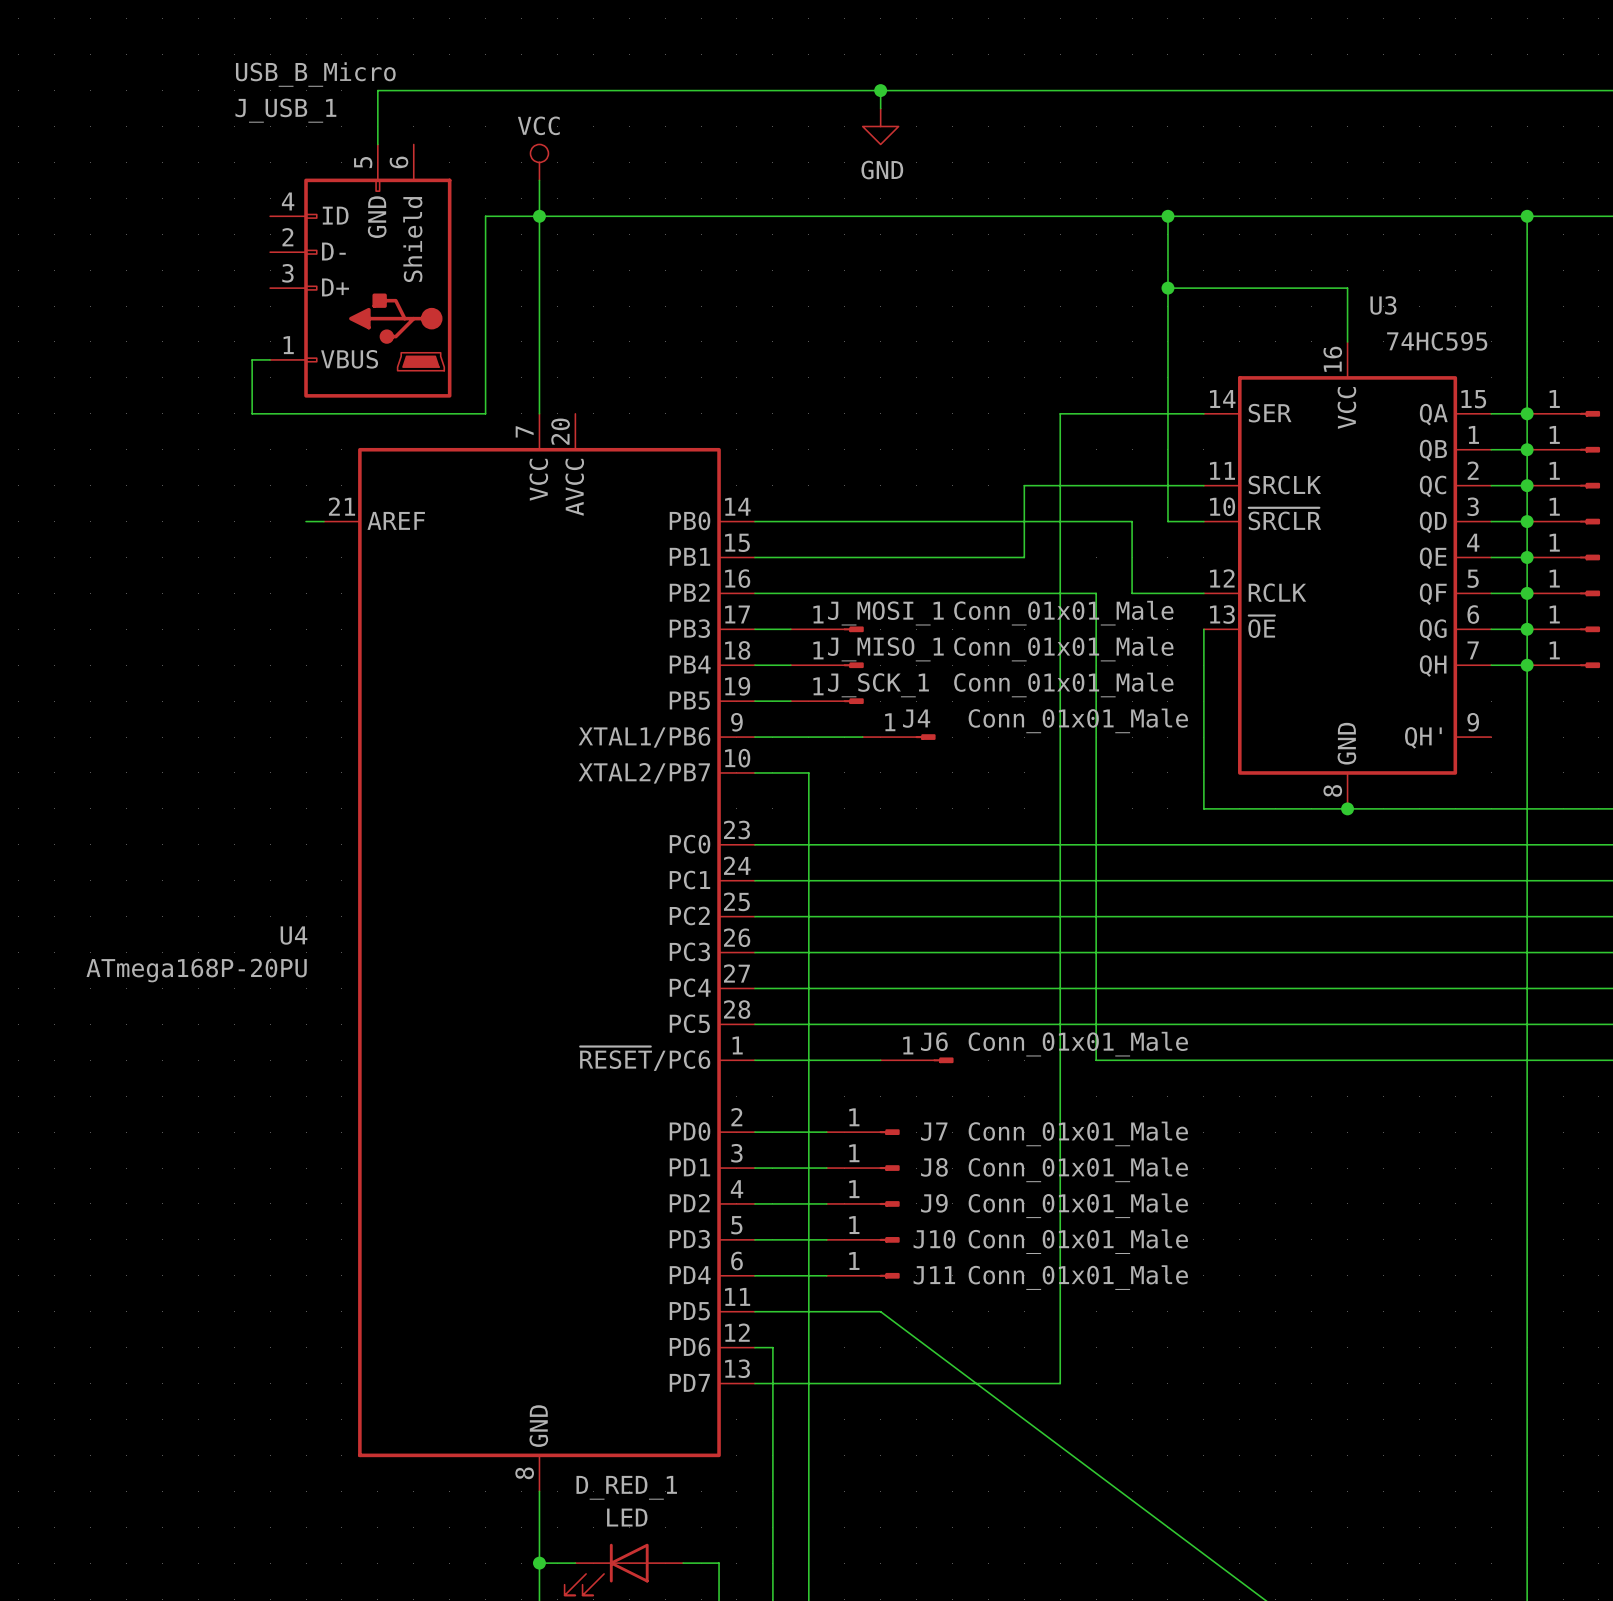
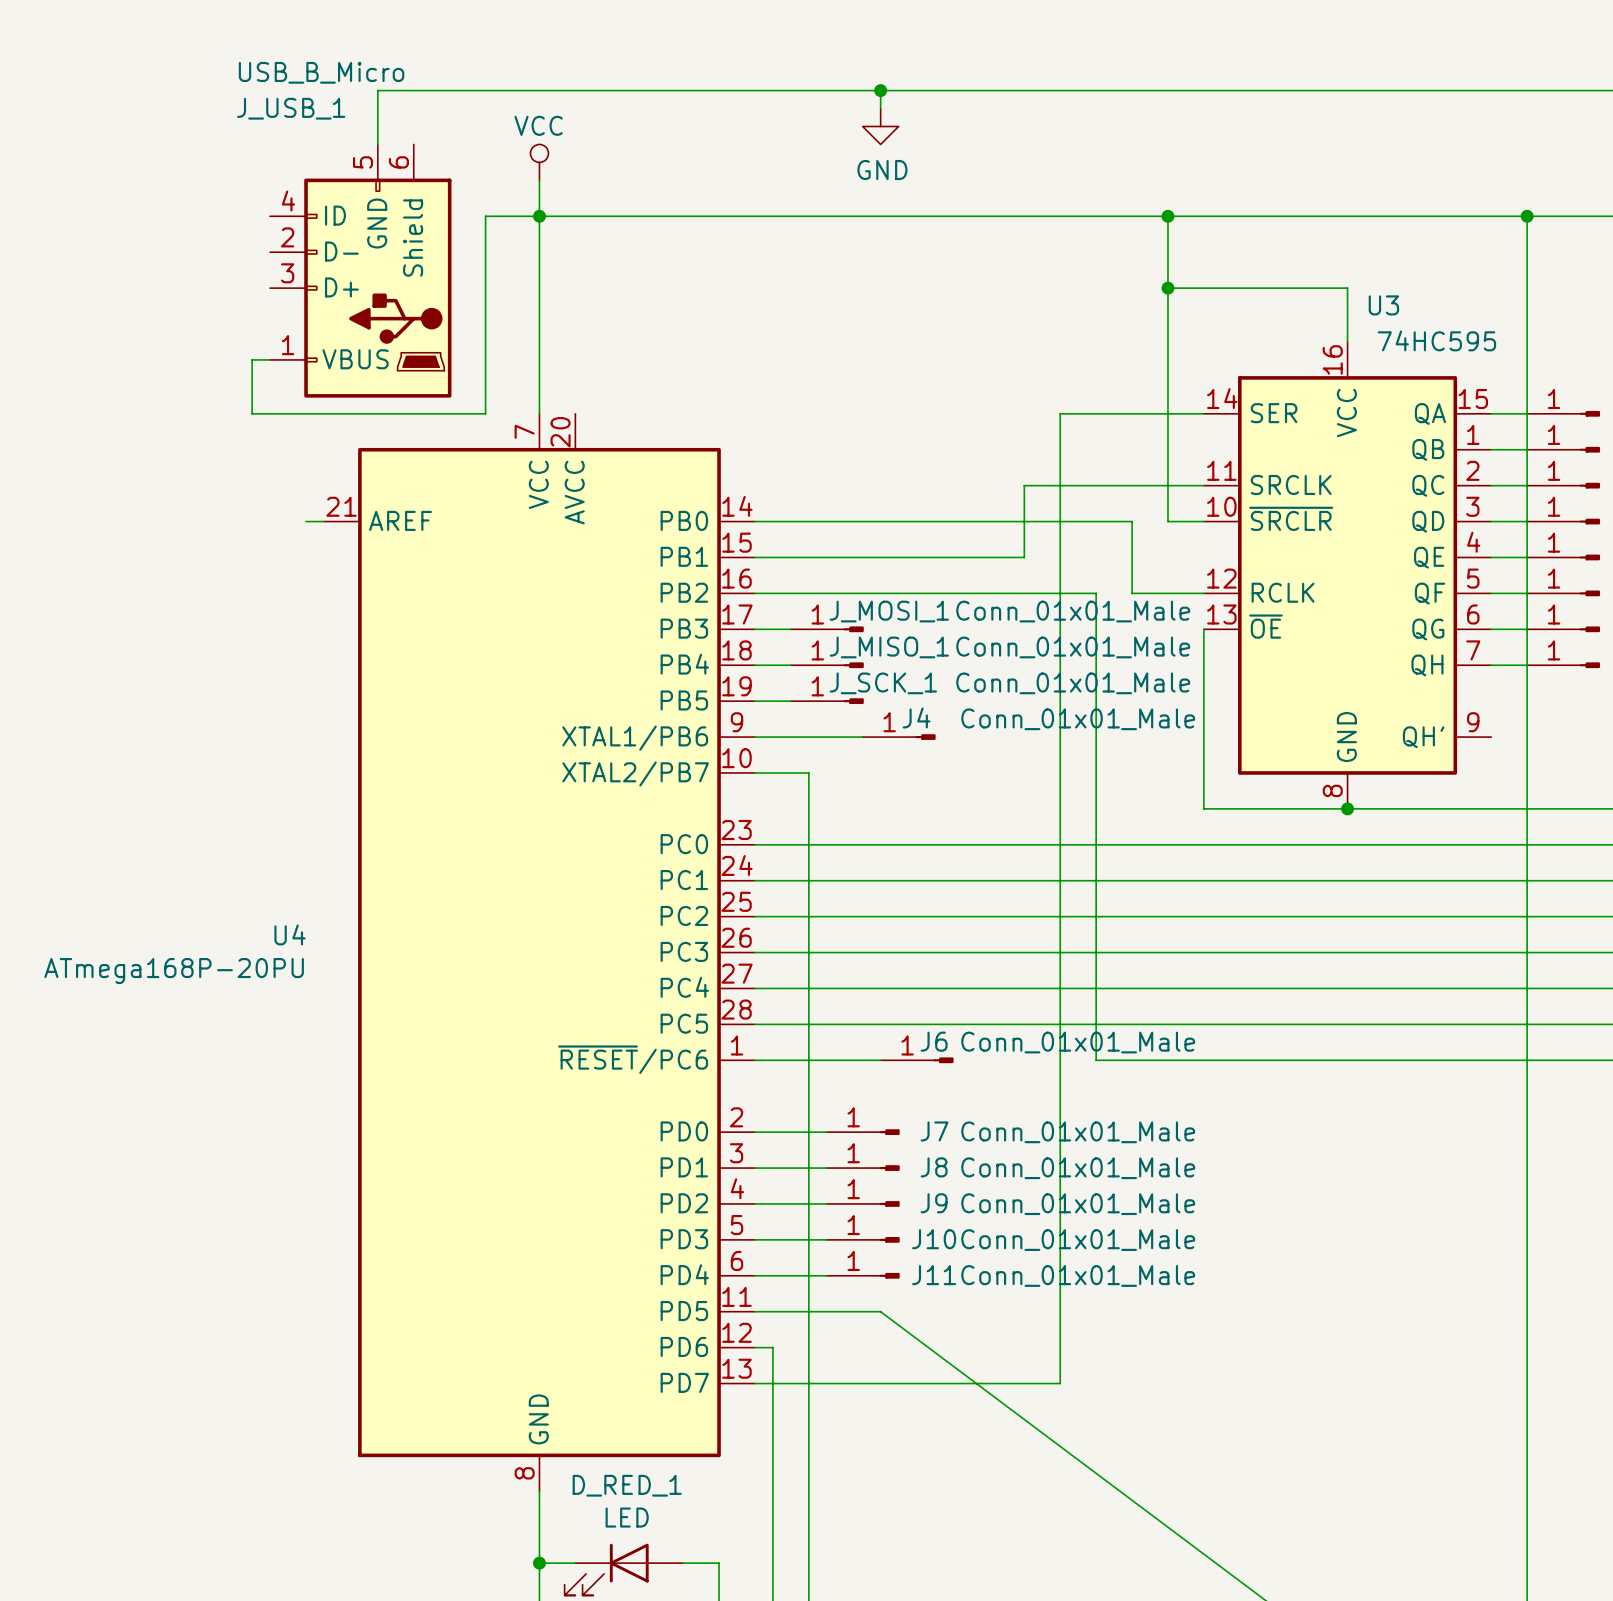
junction: (1527, 413) -> none
junction: (1527, 449) -> none
junction: (1527, 485) -> none
junction: (1527, 521) -> none
junction: (1527, 557) -> none
junction: (1527, 593) -> none
junction: (1527, 629) -> none
junction: (1527, 665) -> none

